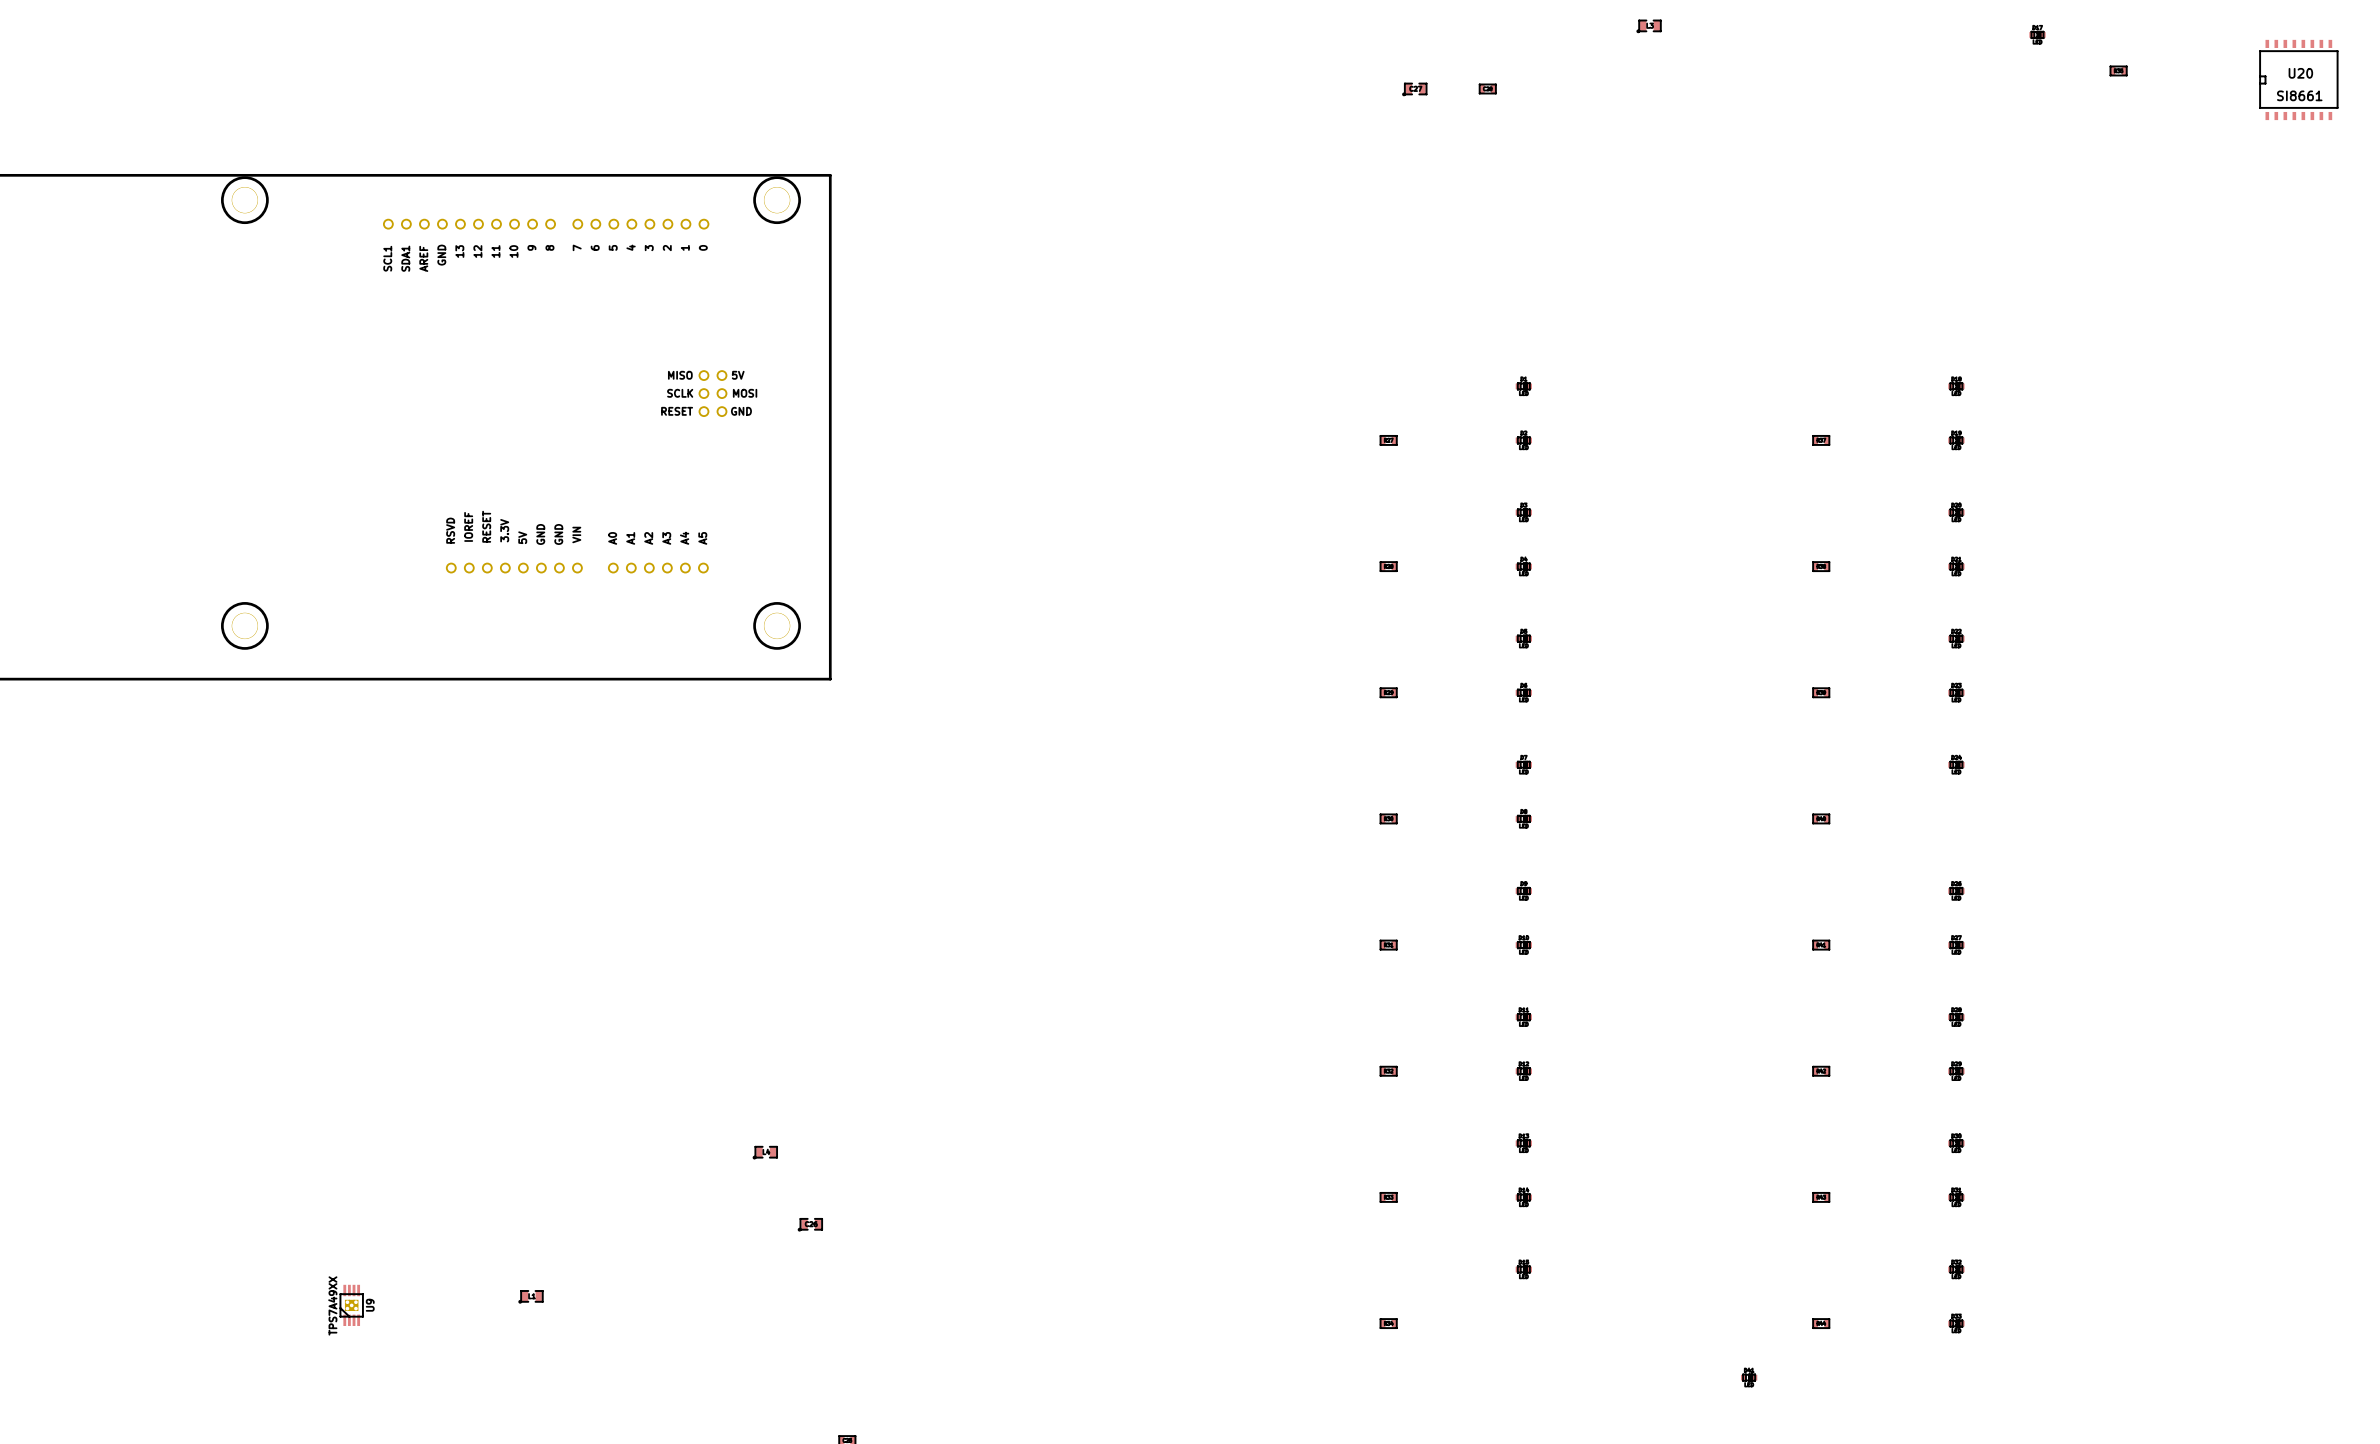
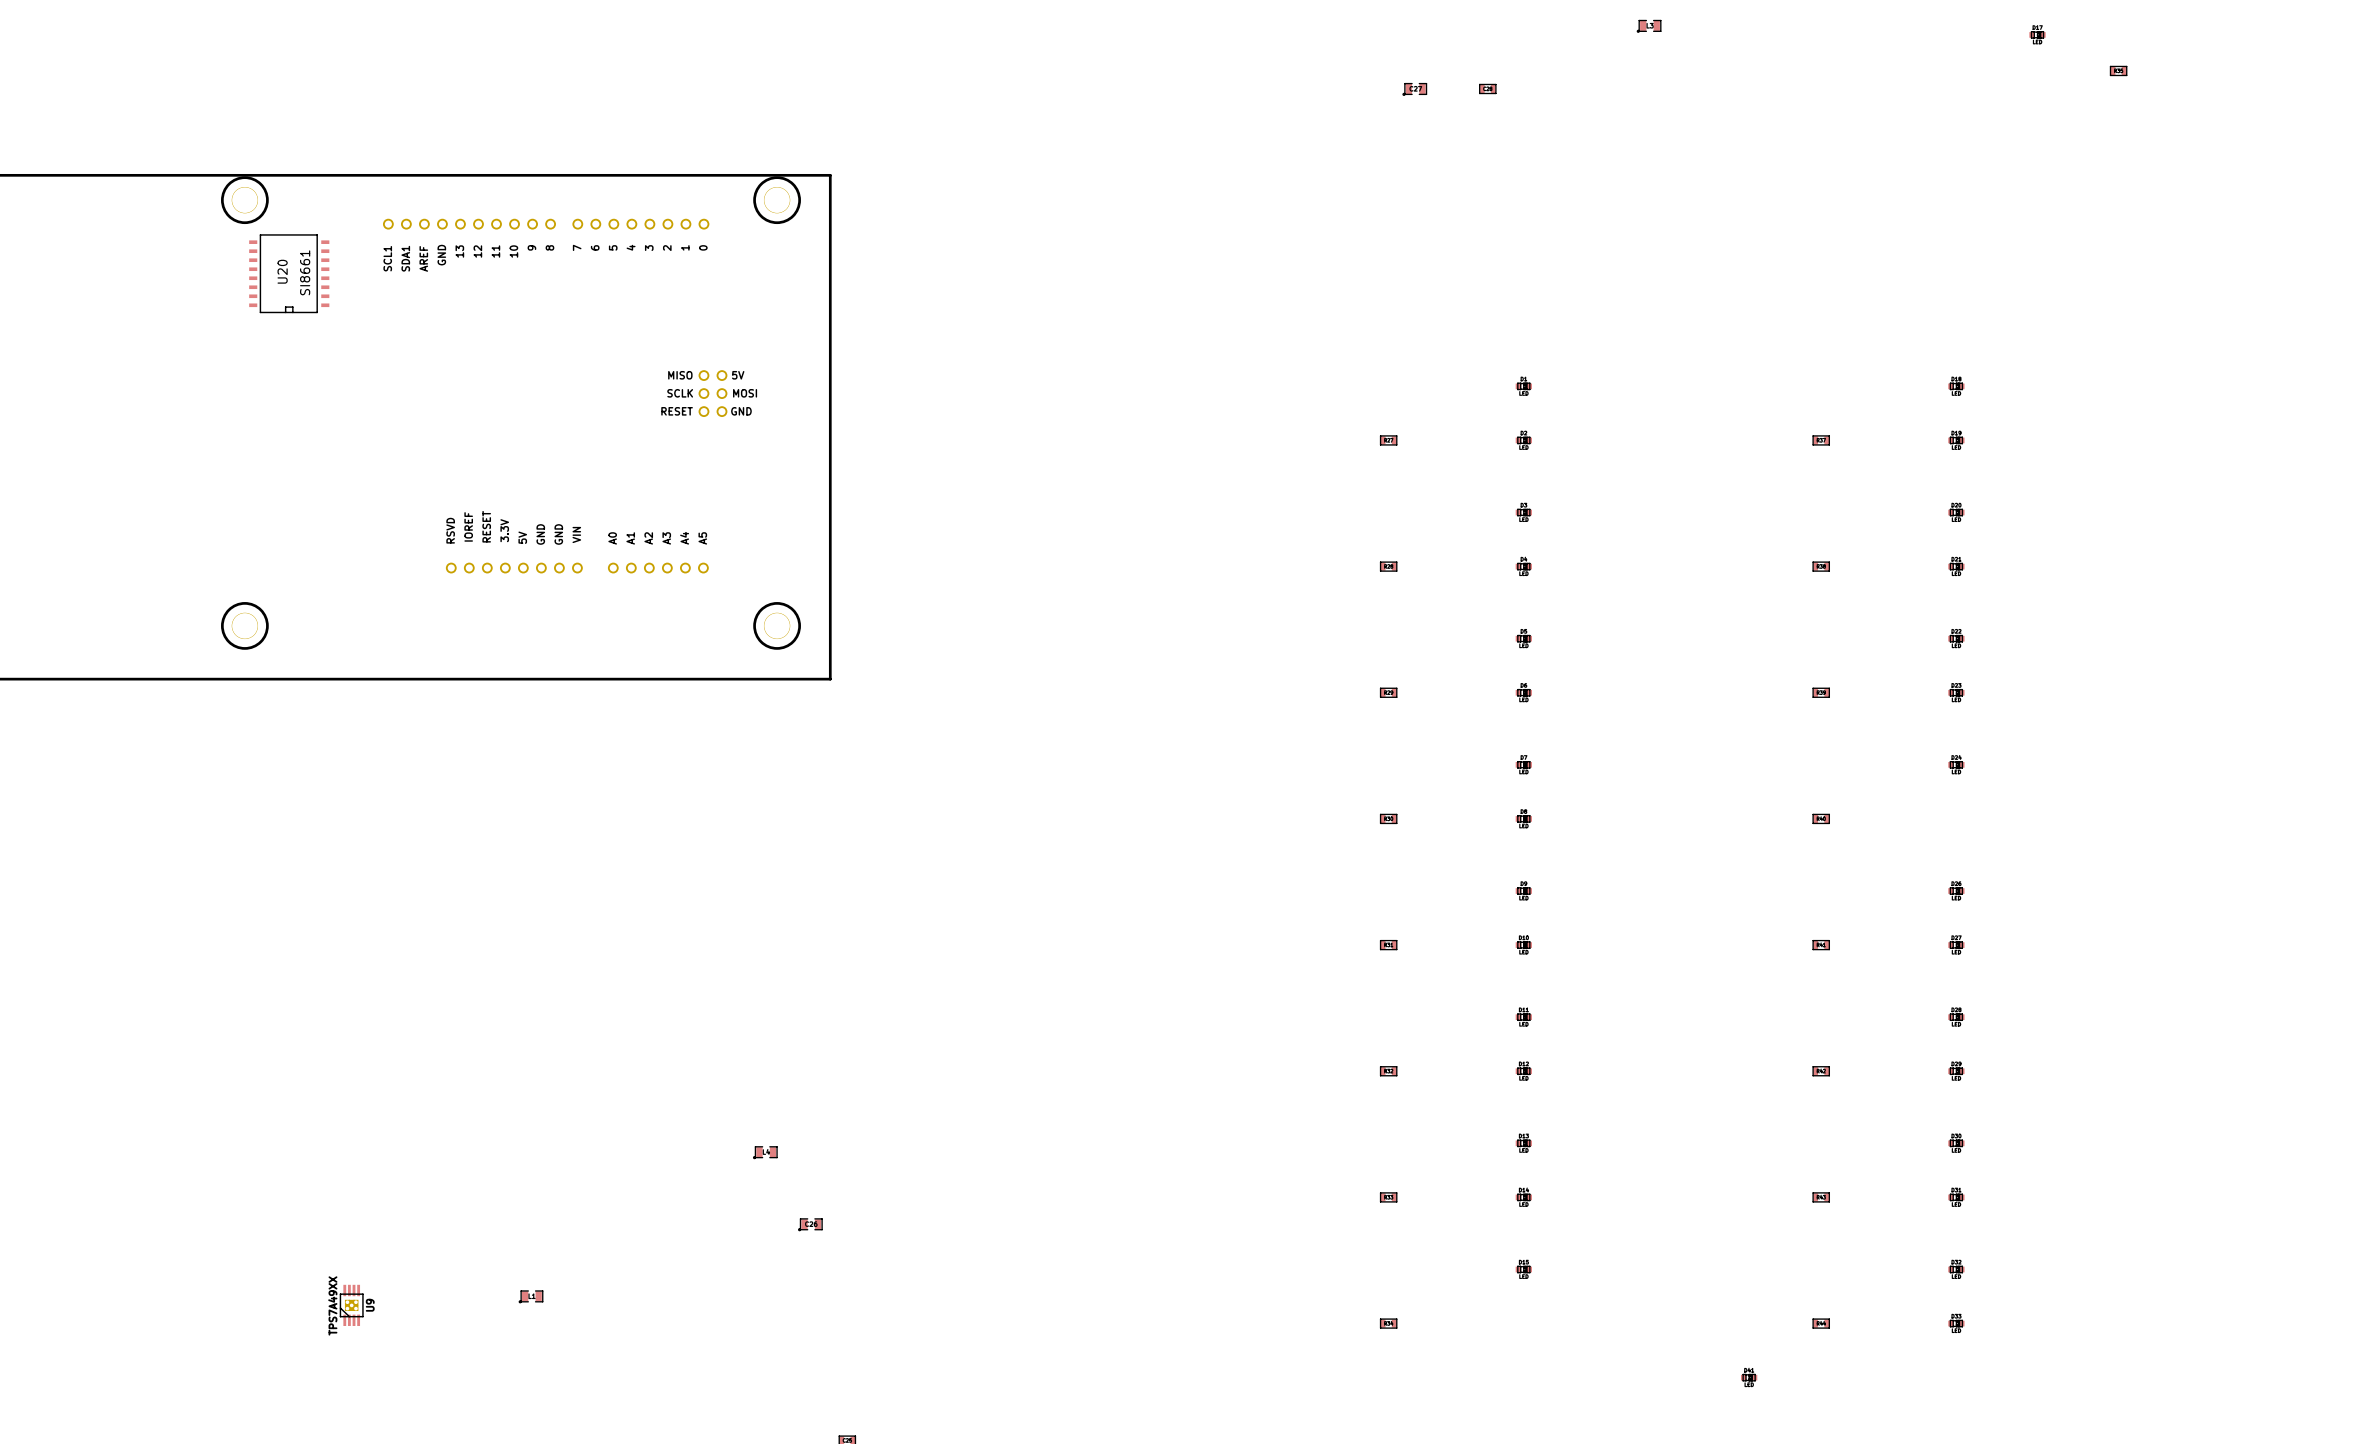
U20 rotation: 0° (2298, 79) -> 90° counterclockwise (289, 273)
U20 position: (2298, 79) -> (289, 273)

